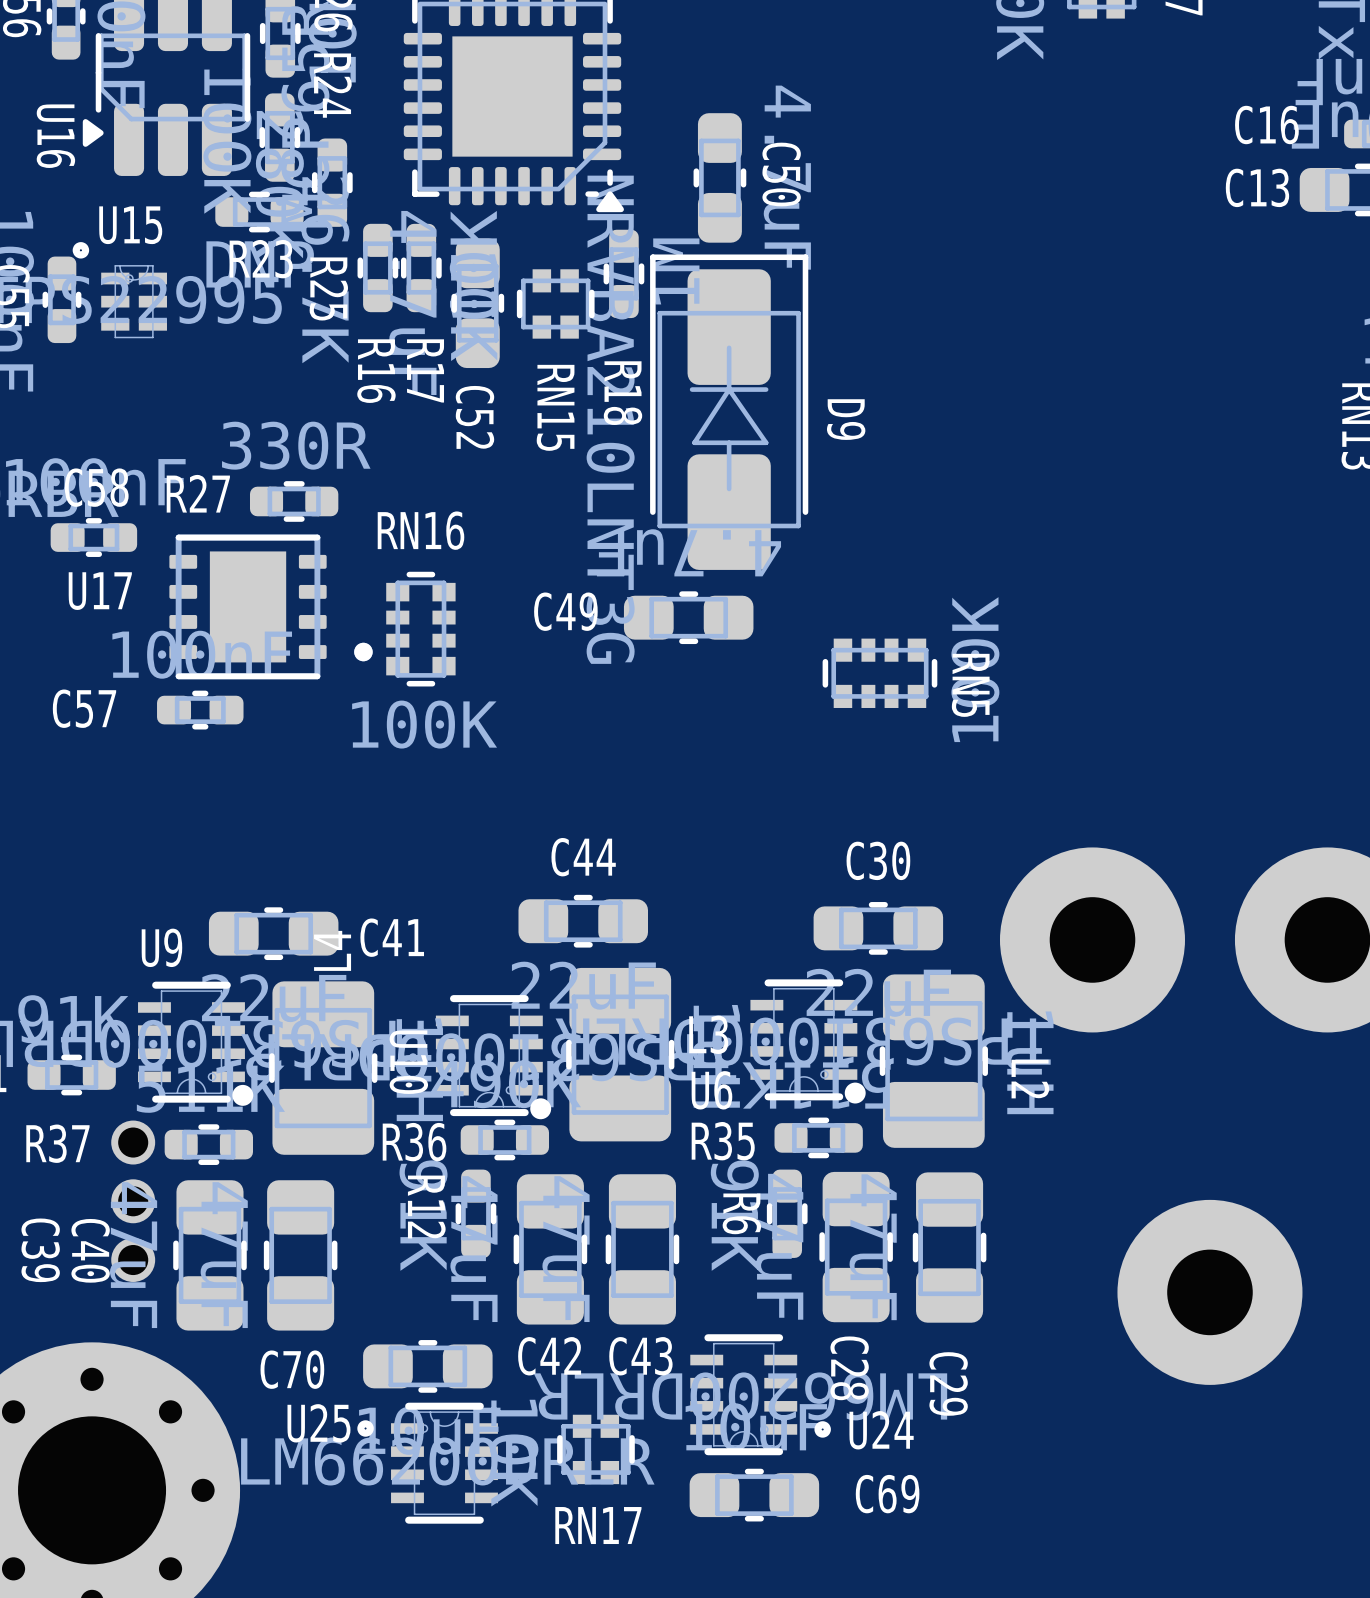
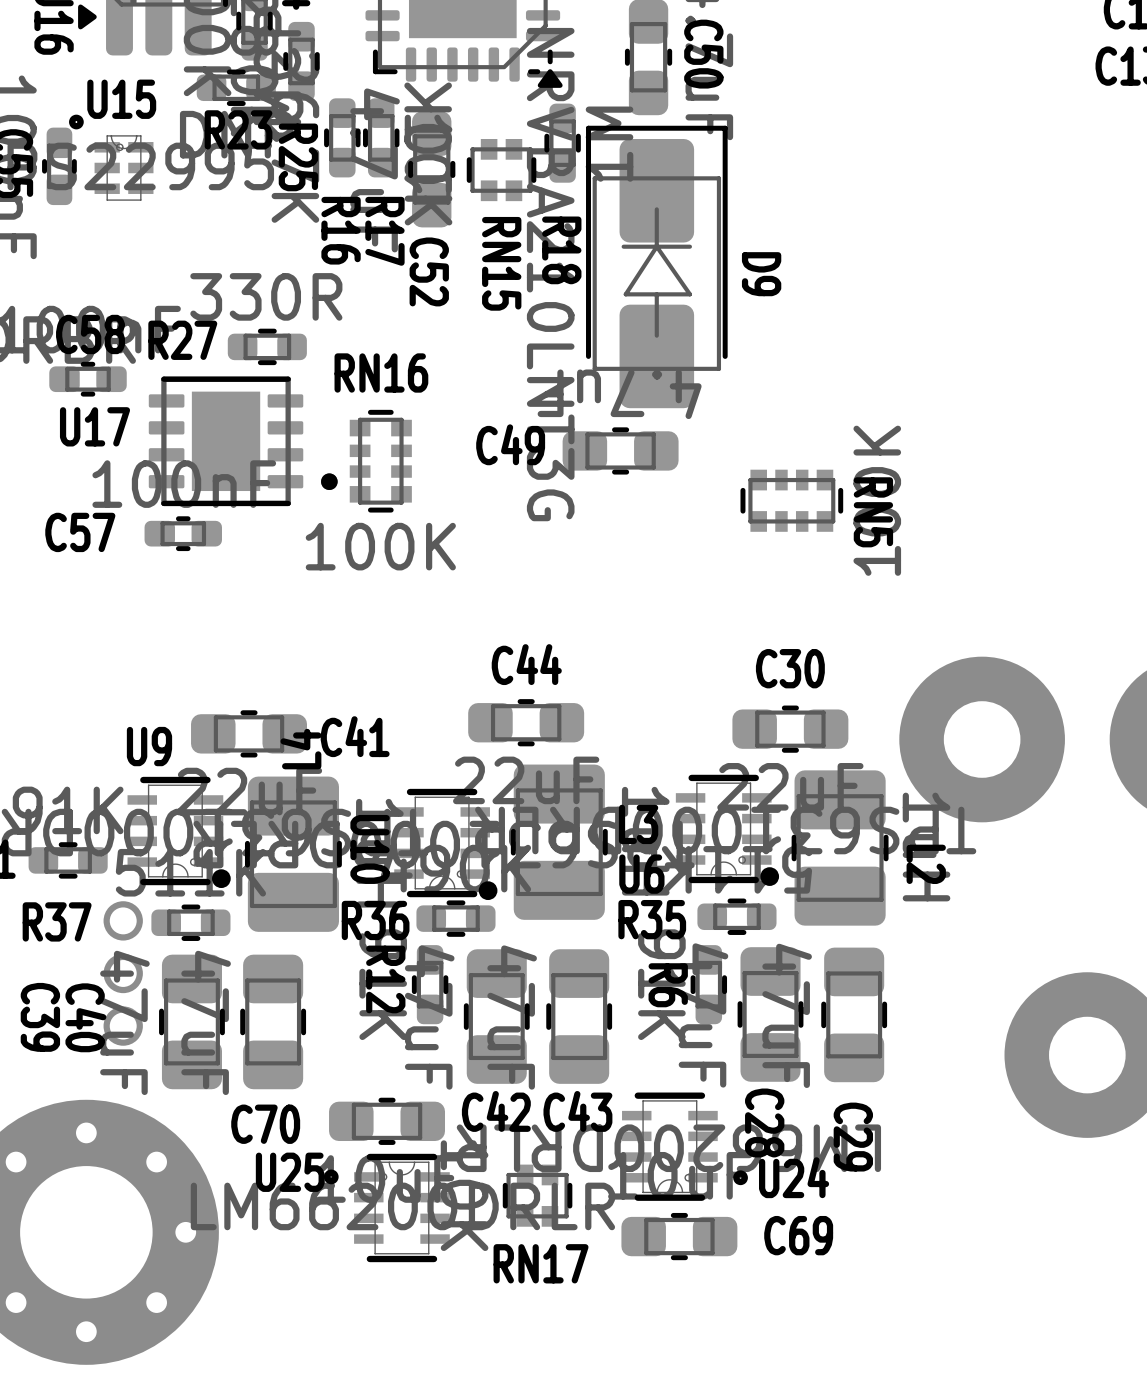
U17 footprint: [169, 534, 373, 680] -> [148, 376, 338, 507]

